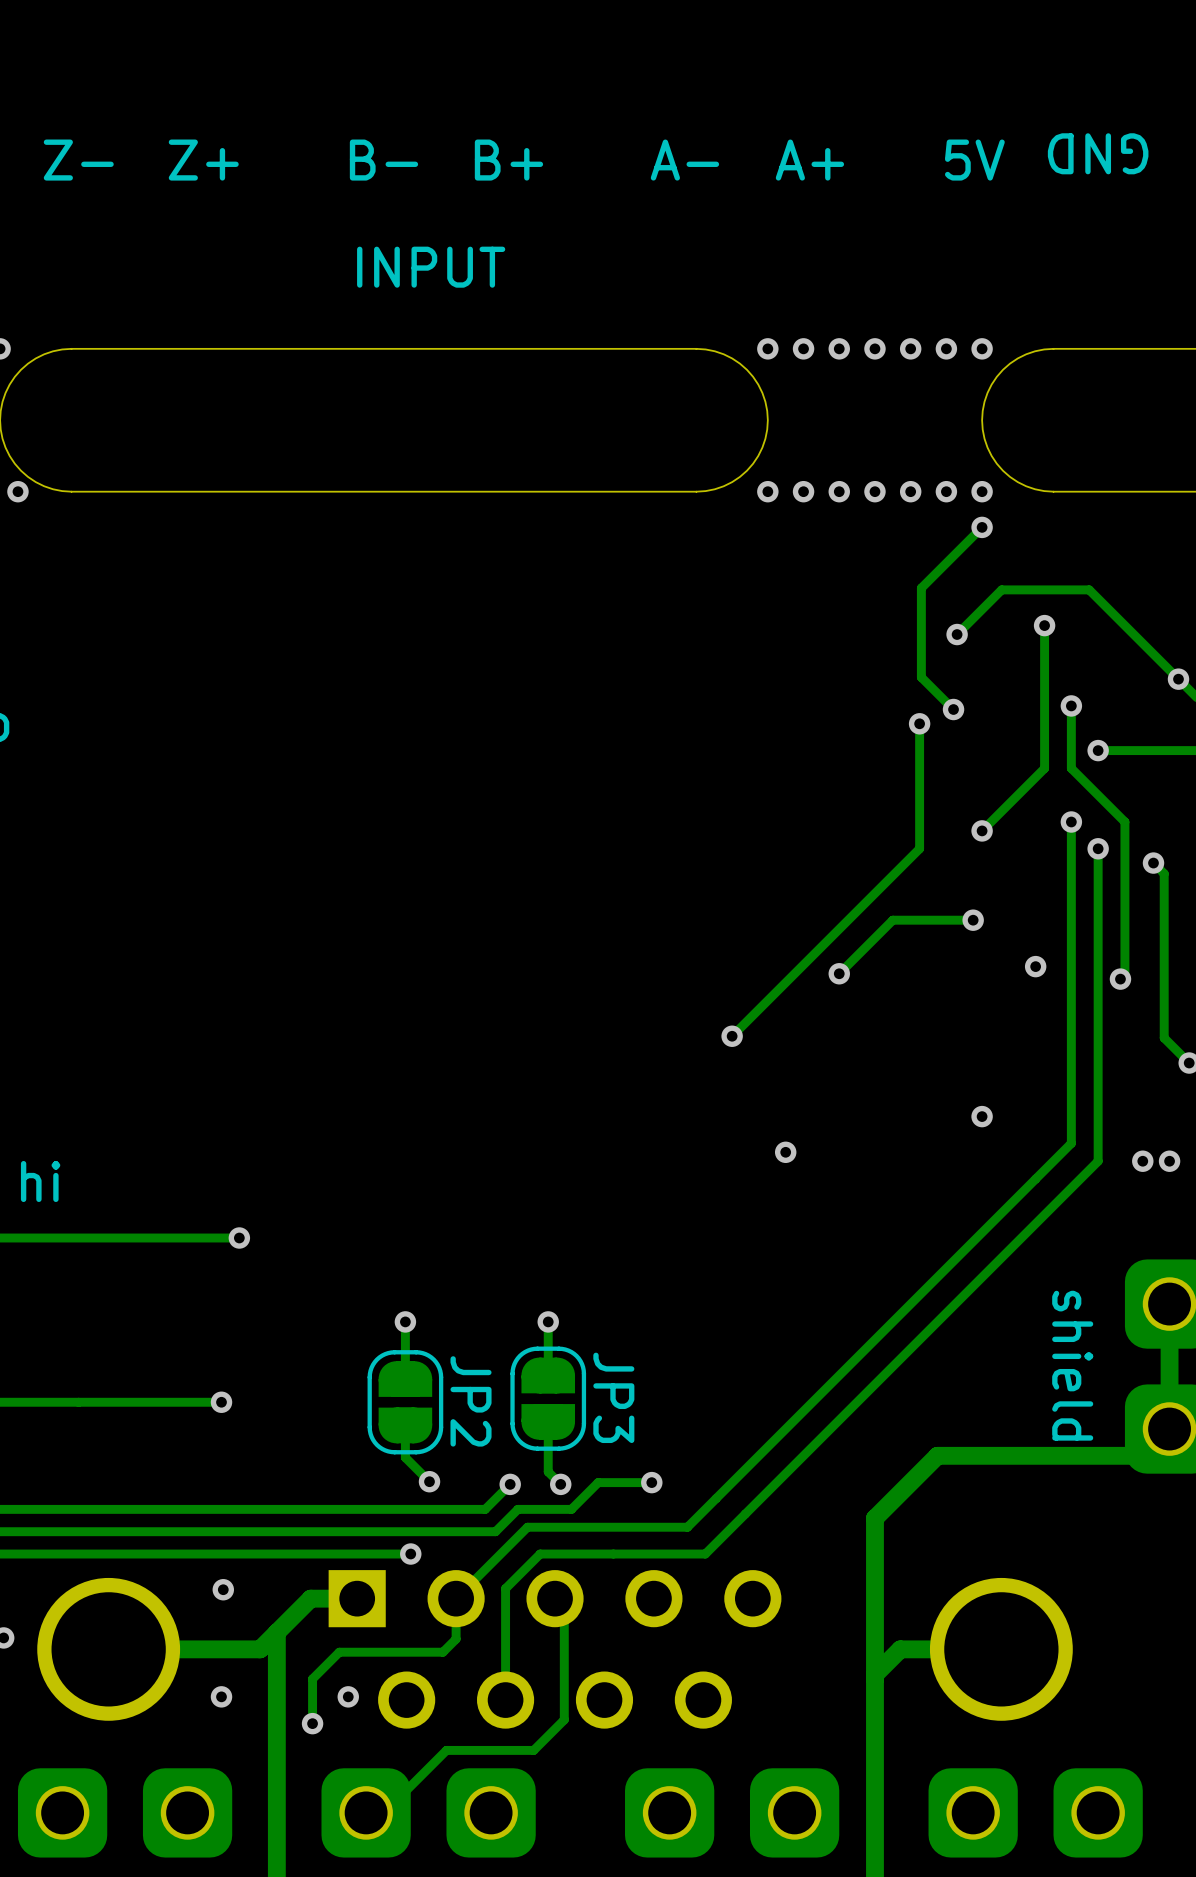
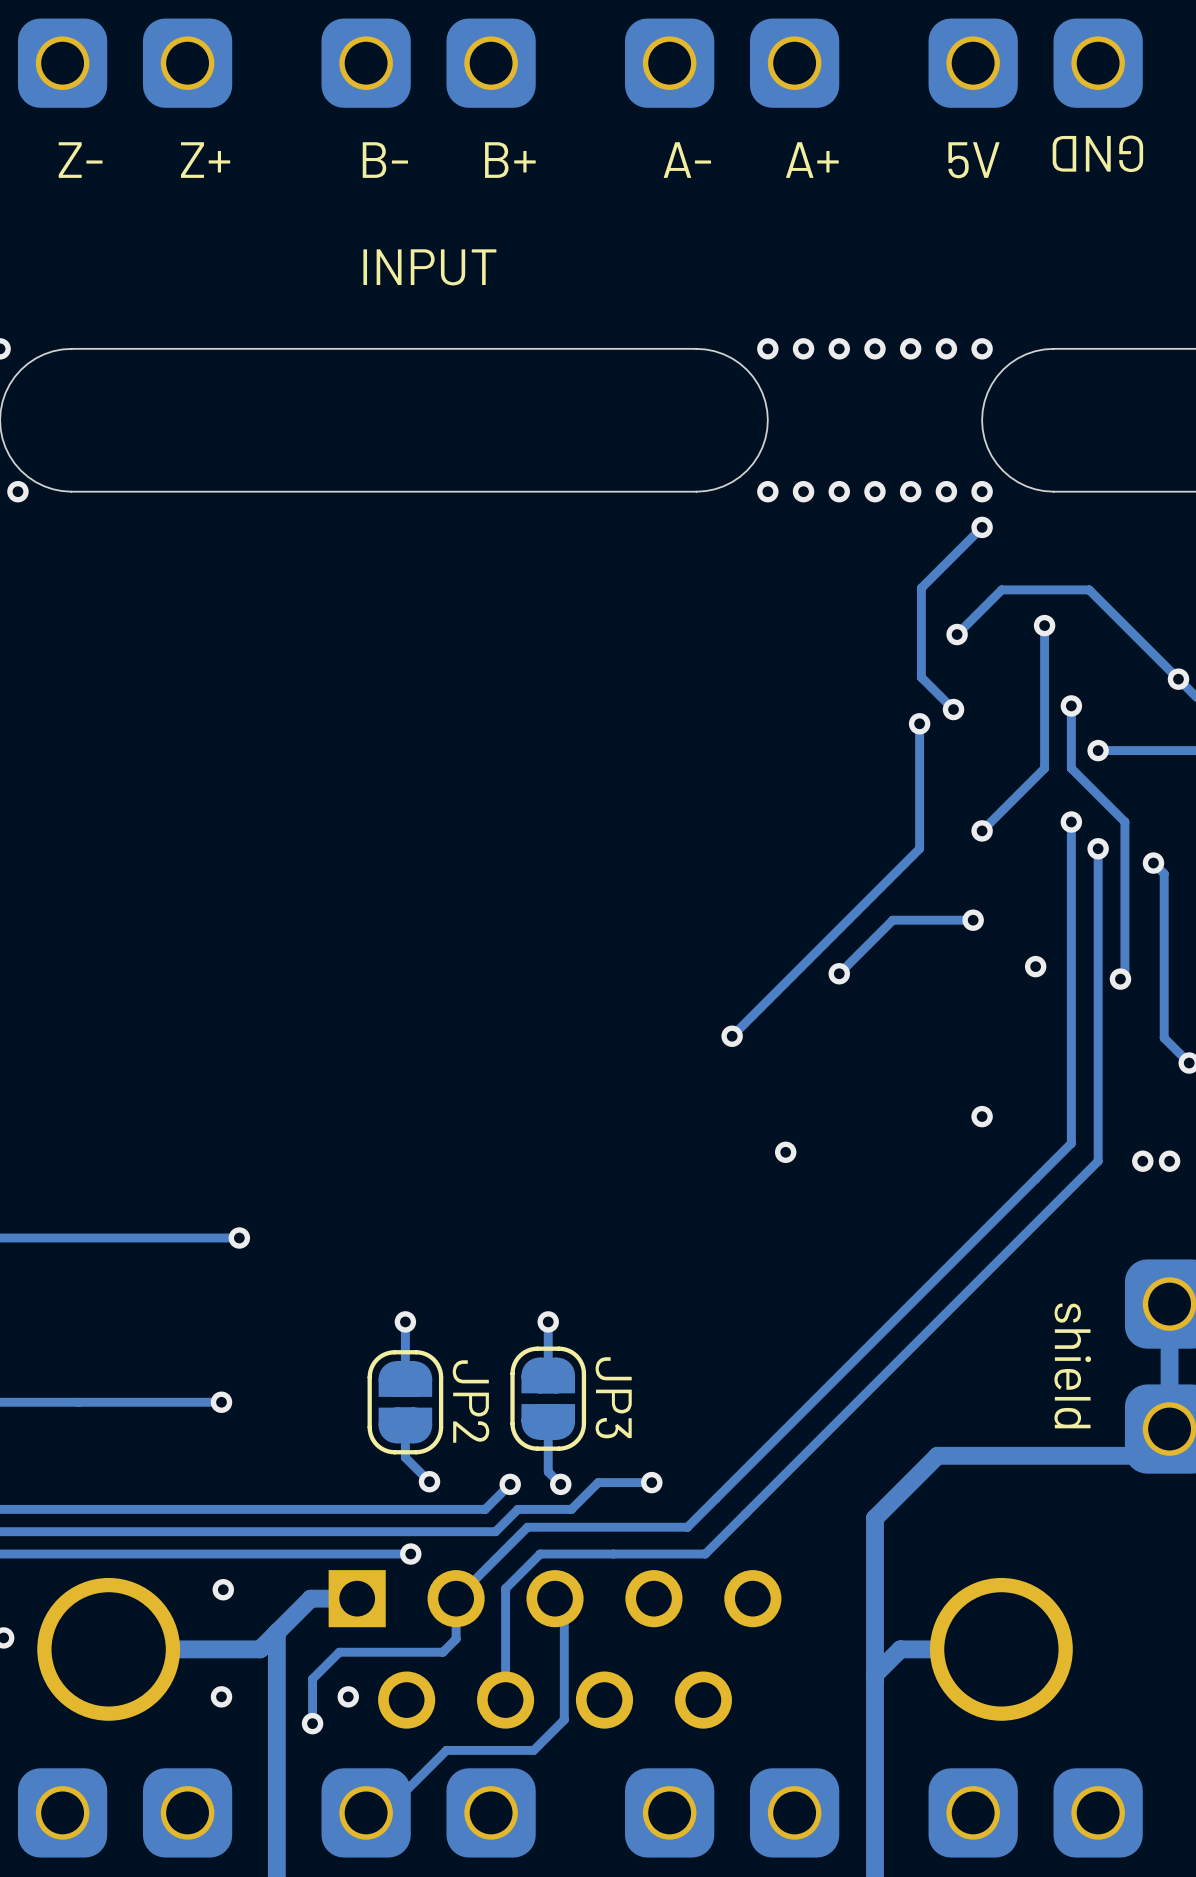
part: none -> (125, 63)
part: none -> (428, 63)
part: none -> (732, 63)
part: none -> (1035, 63)

